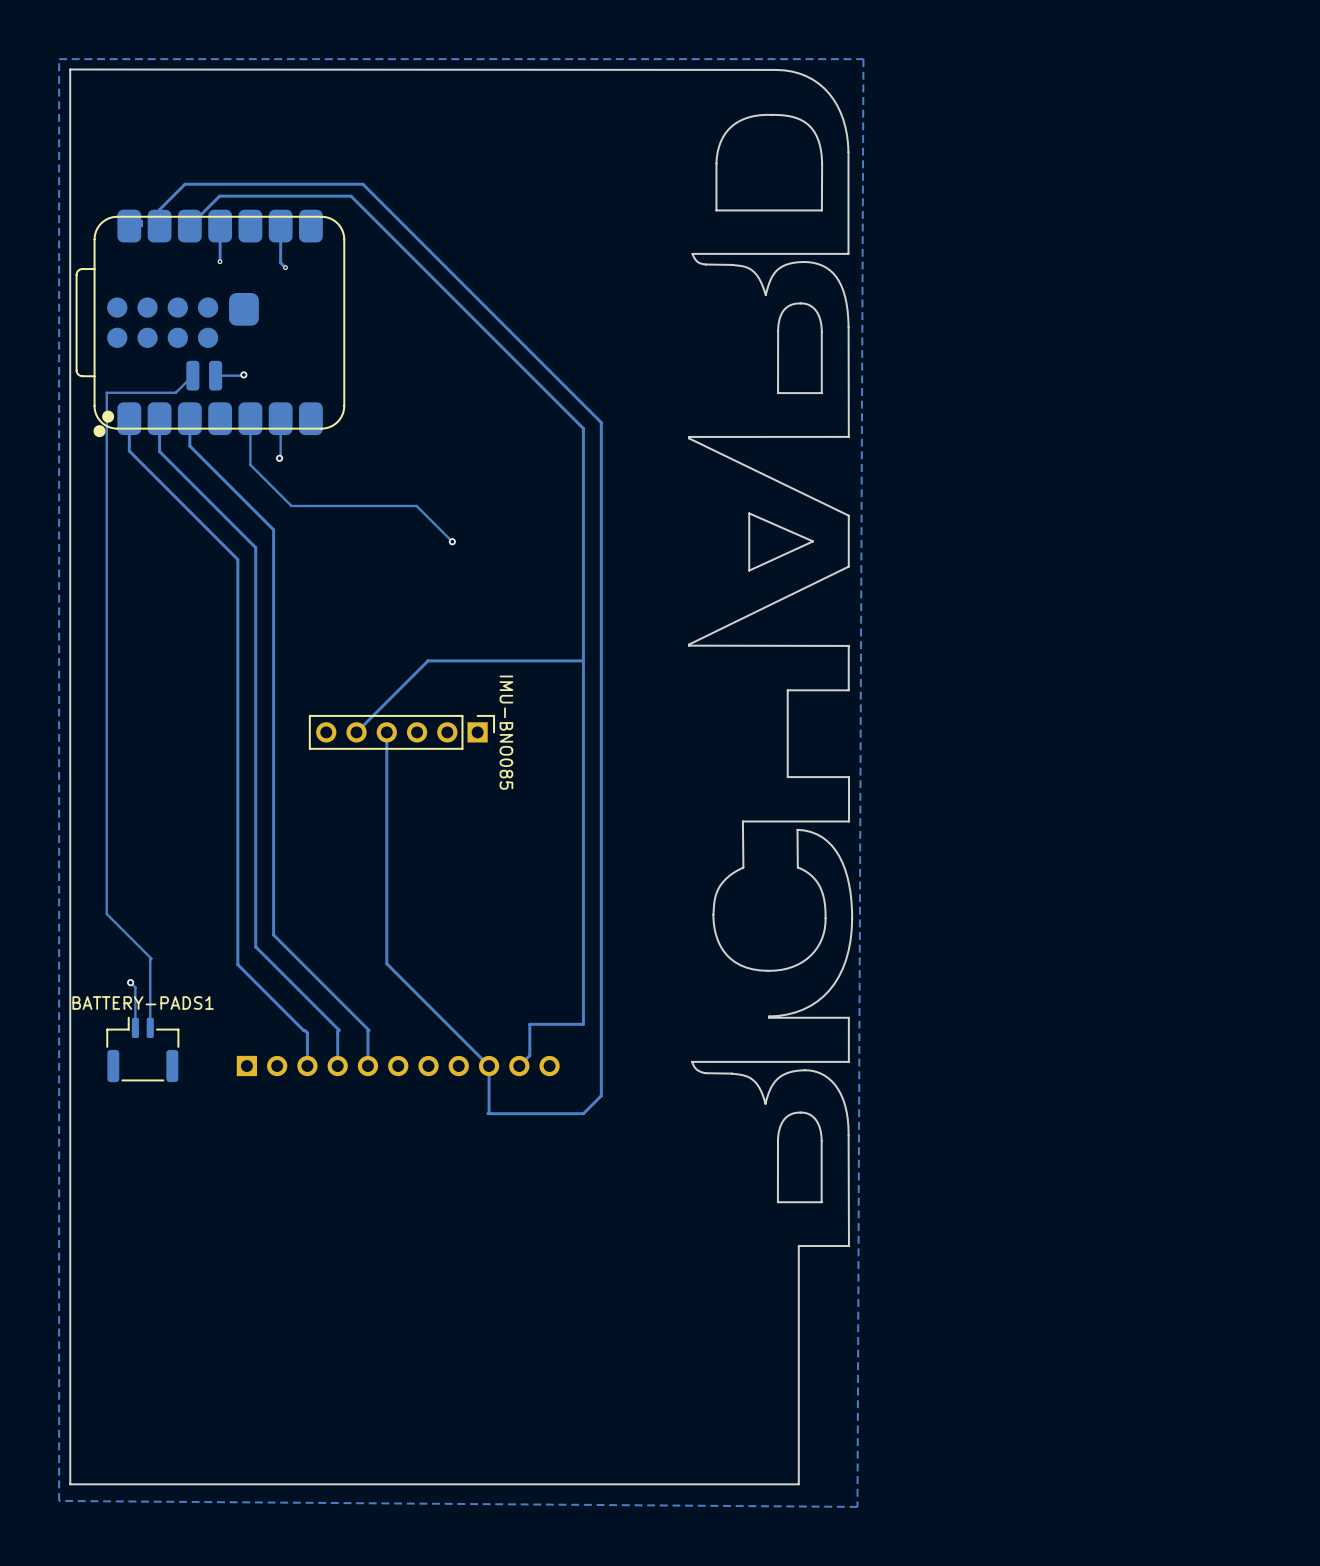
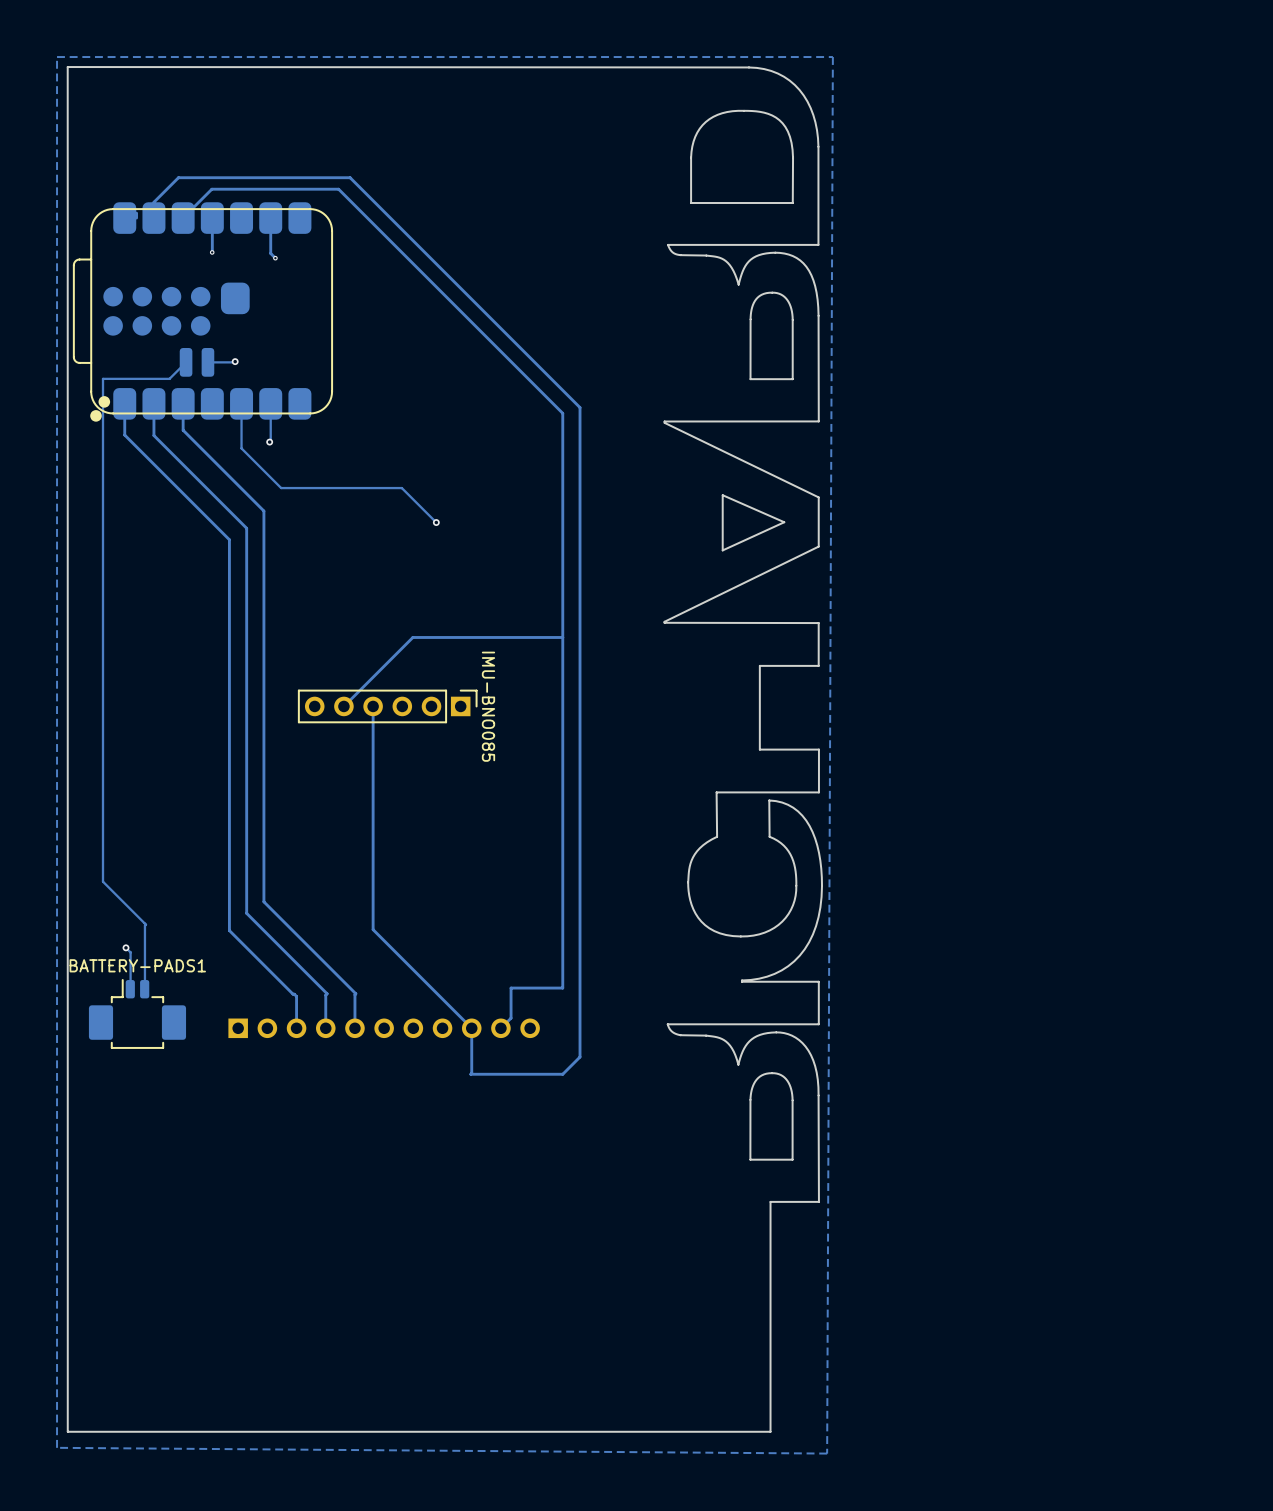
BATTERY-PADS1 footprint: [106, 1017, 180, 1083] -> [88, 979, 187, 1049]

